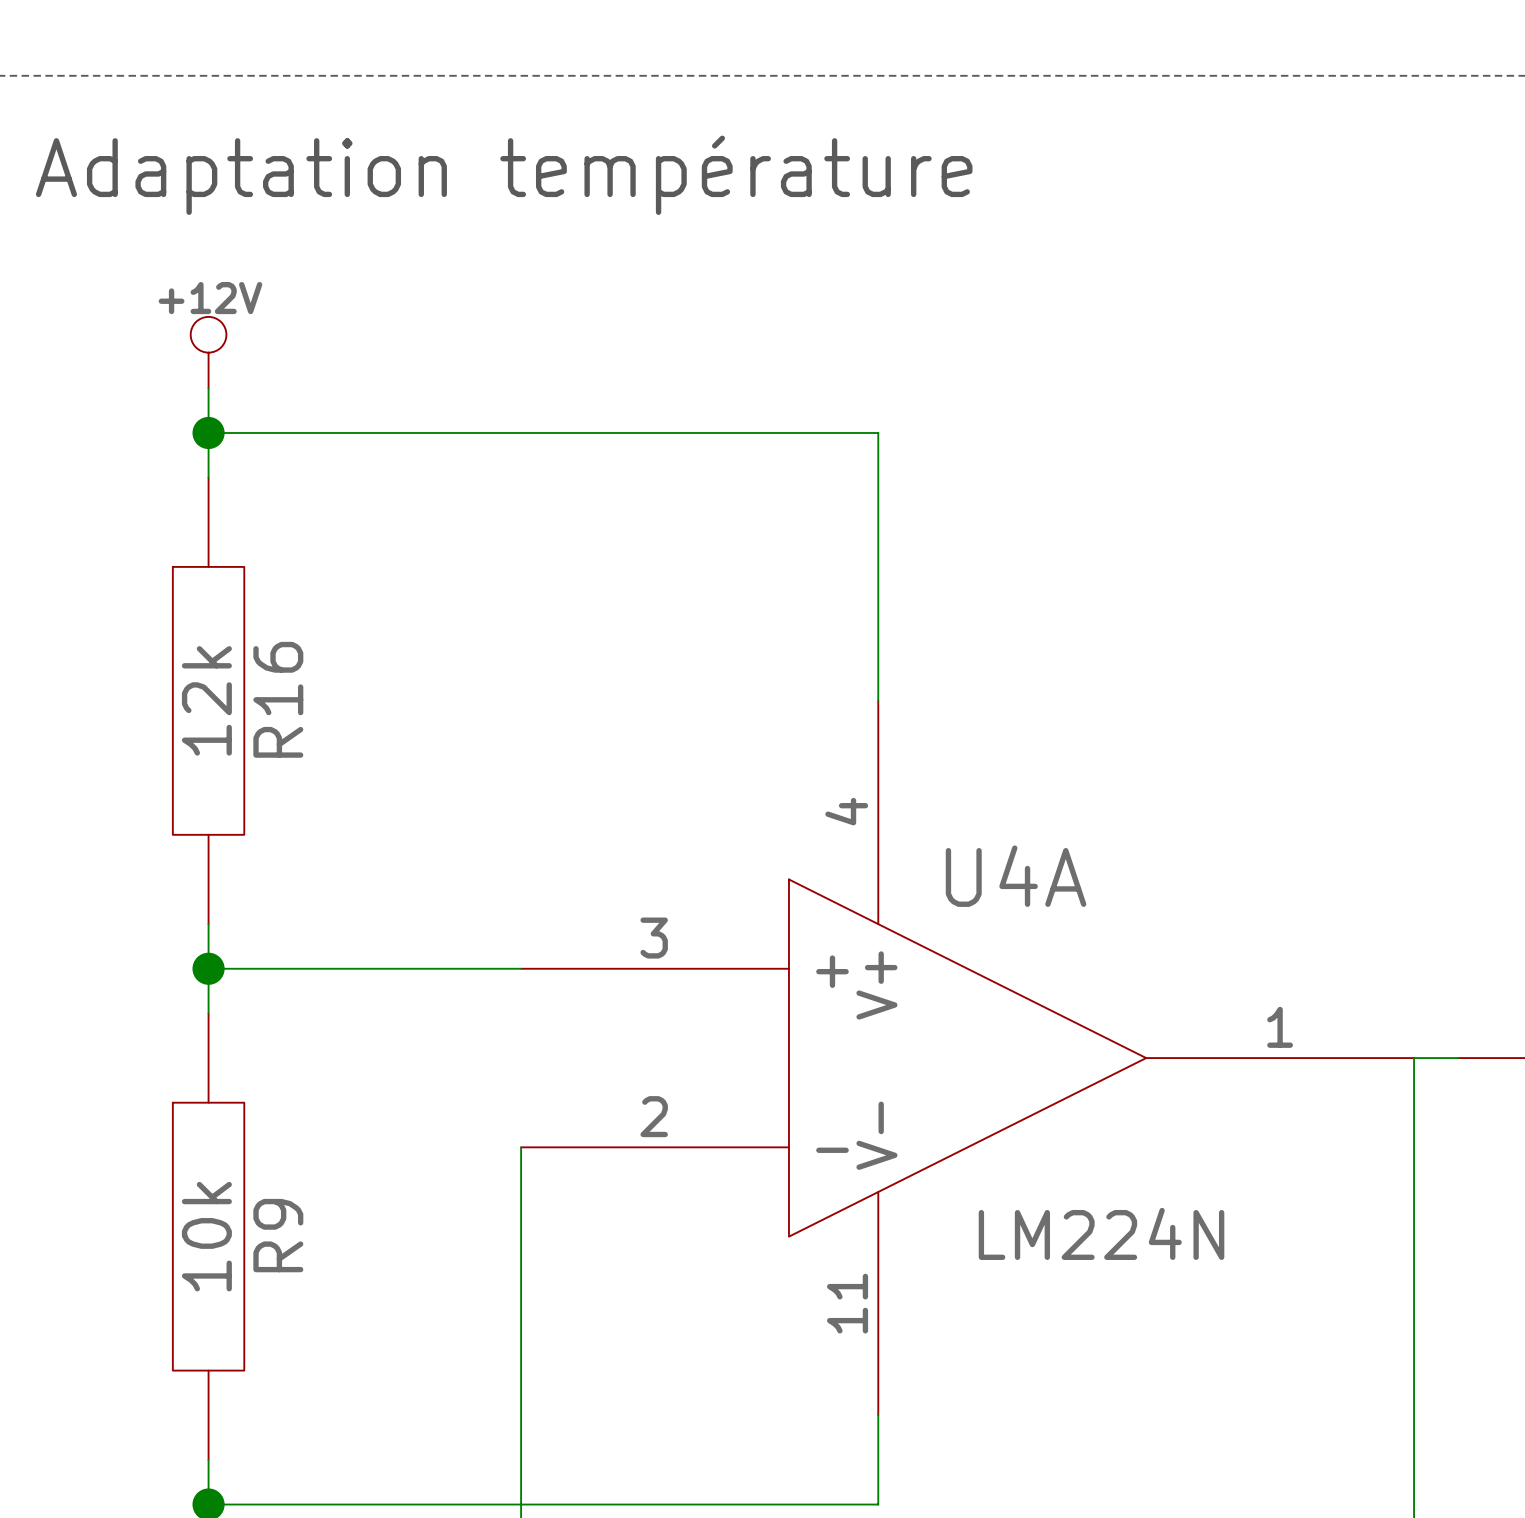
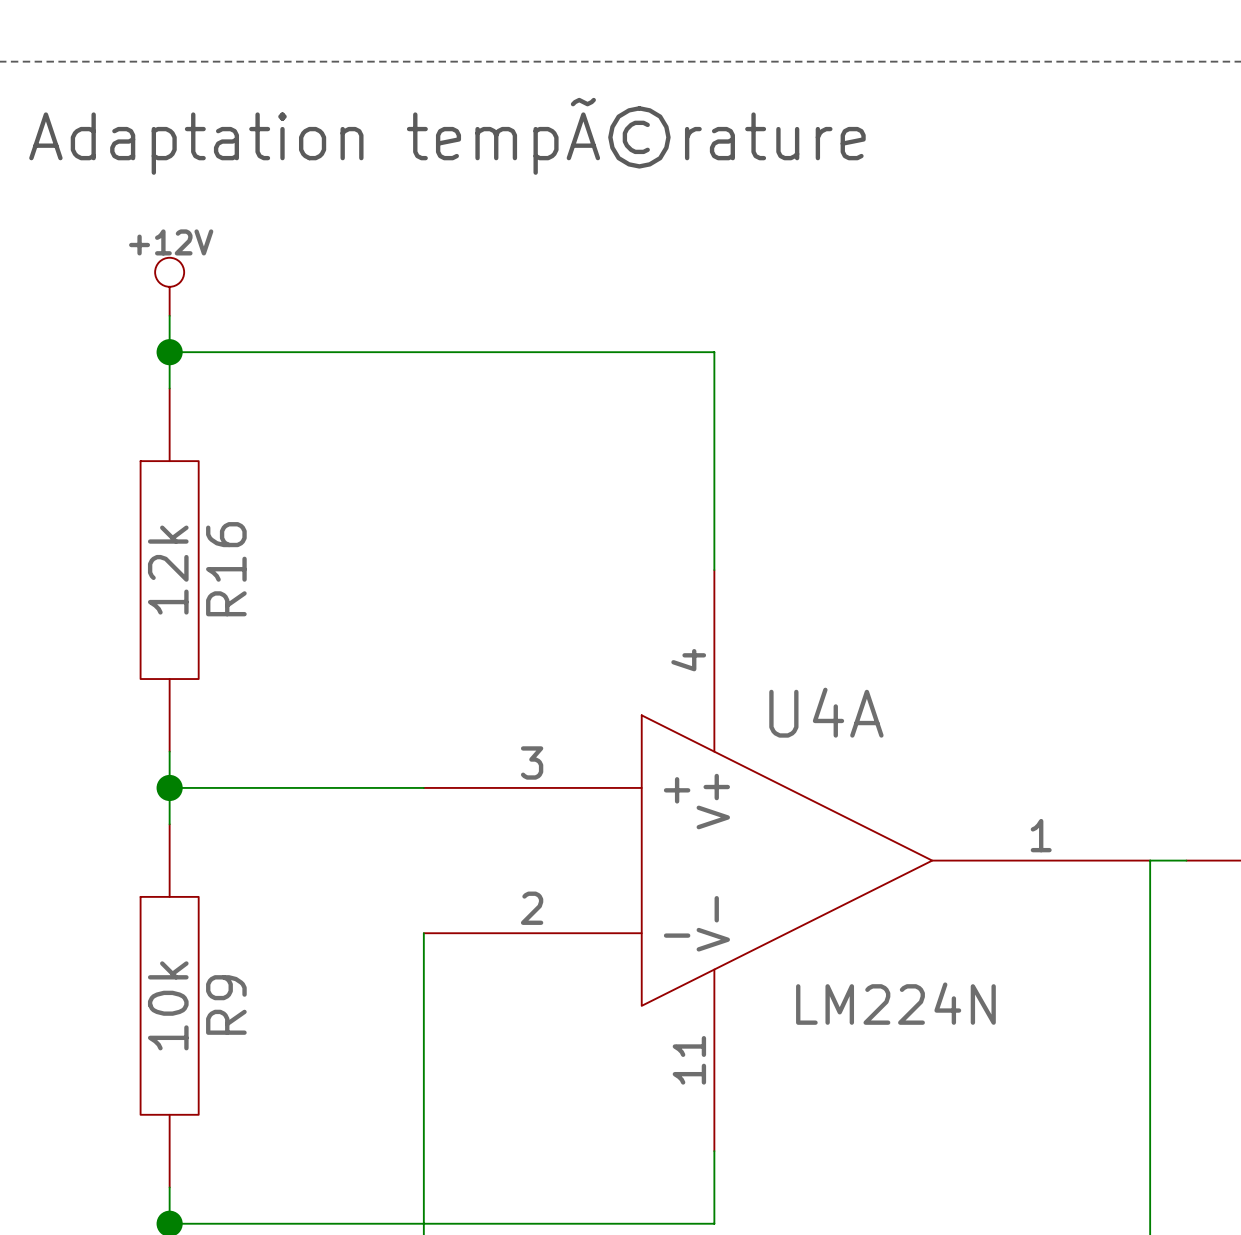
text: Adaptation température (504, 175) -> Adaptation tempÃ©rature (447, 136)

